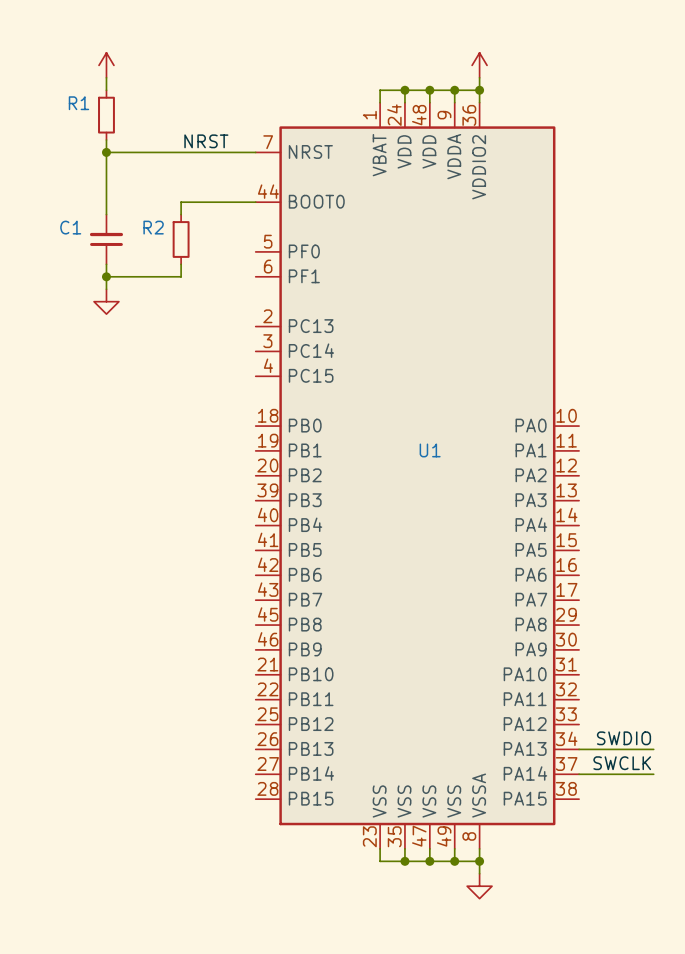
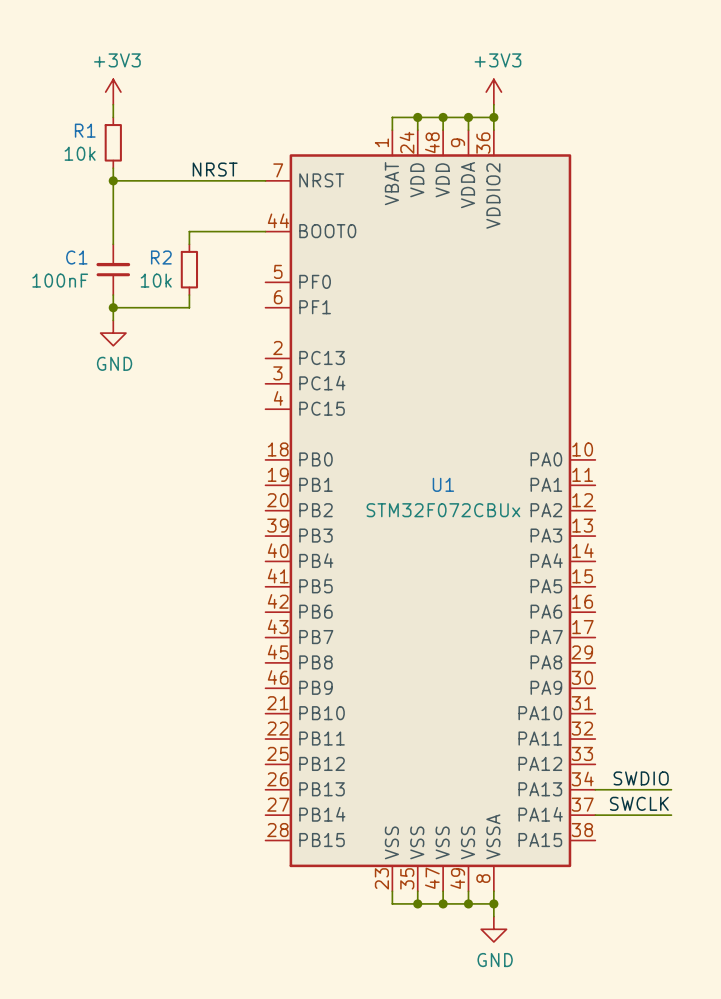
power symbol text: none -> +3V3 (117, 60)
power symbol text: none -> +3V3 (497, 60)
R1 value: none -> 10k (80, 153)
C1 value: none -> 100nF (60, 280)
R2 value: none -> 10k (156, 280)
power symbol text: none -> GND (114, 363)
U1 value: none -> STM32F072CBUx (443, 510)
power symbol text: none -> GND (495, 960)

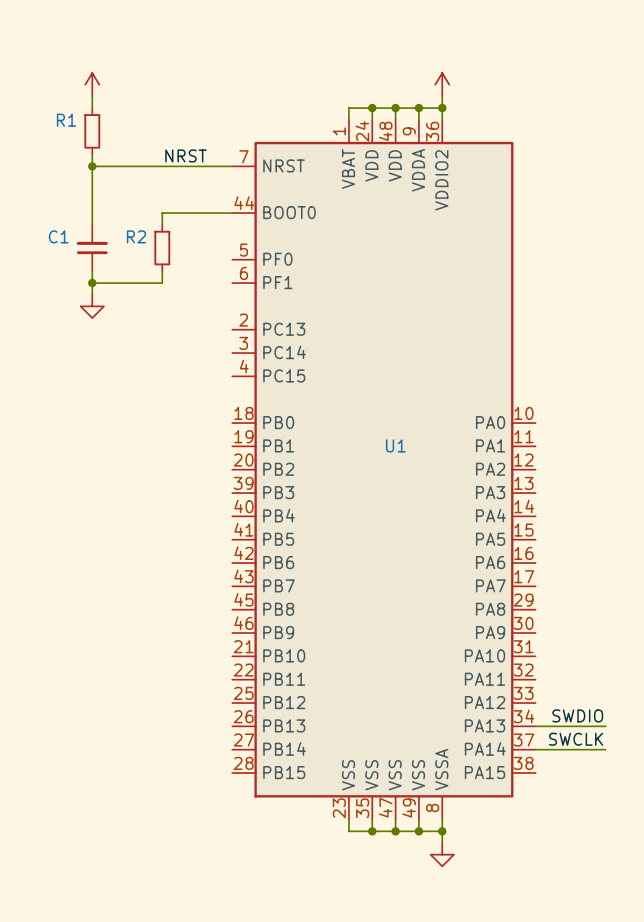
power symbol text: +3V3 (117, 60) -> none
power symbol text: +3V3 (497, 60) -> none
R1 value: 10k (80, 153) -> none
C1 value: 100nF (60, 280) -> none
R2 value: 10k (156, 280) -> none
power symbol text: GND (114, 363) -> none
U1 value: STM32F072CBUx (443, 510) -> none
power symbol text: GND (495, 960) -> none

